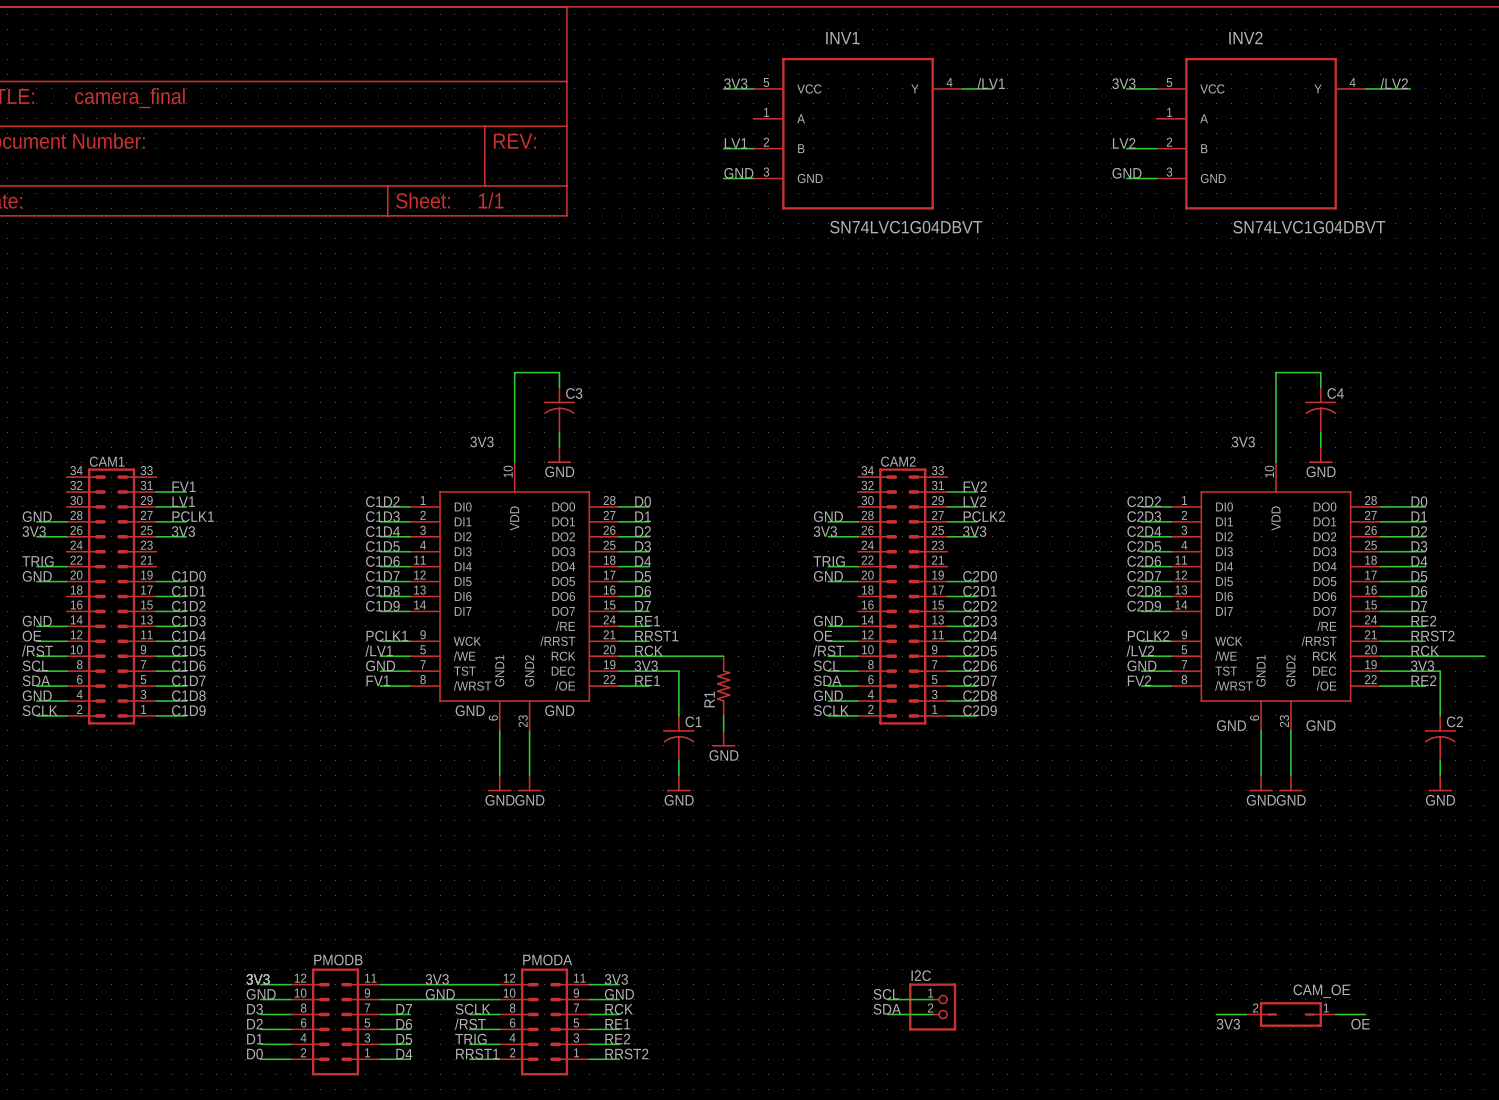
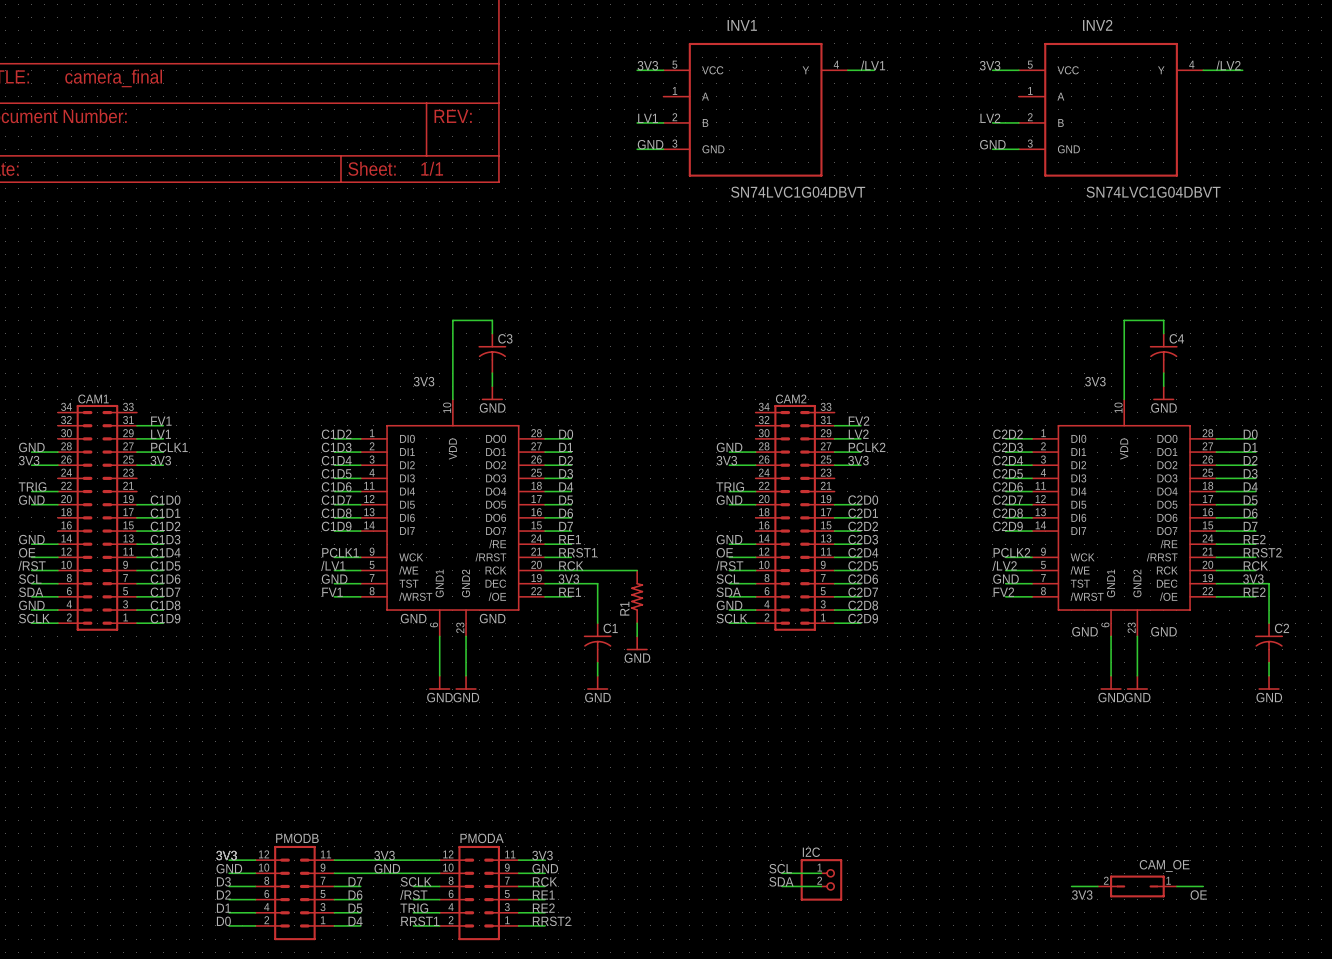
wire: (1425, 656) (1484, 656) -> none

